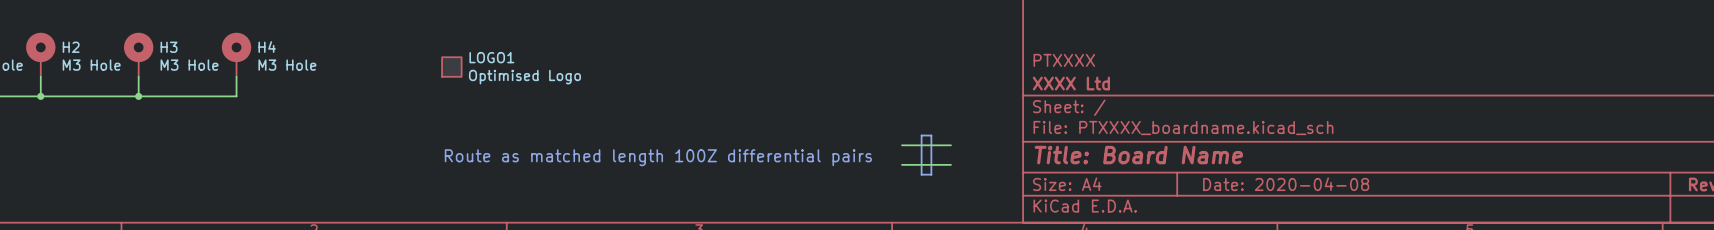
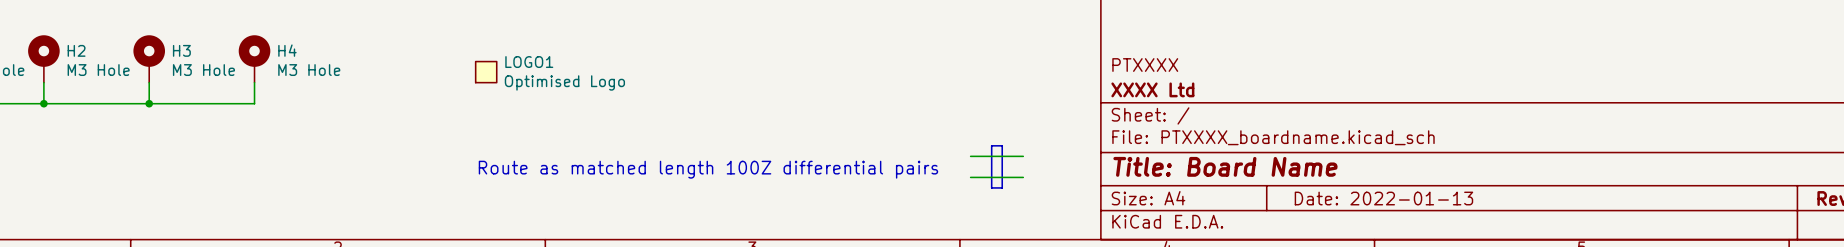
title block: Date: 2020-04-08 (1286, 184) -> Date: 2022-01-13 (1383, 198)

